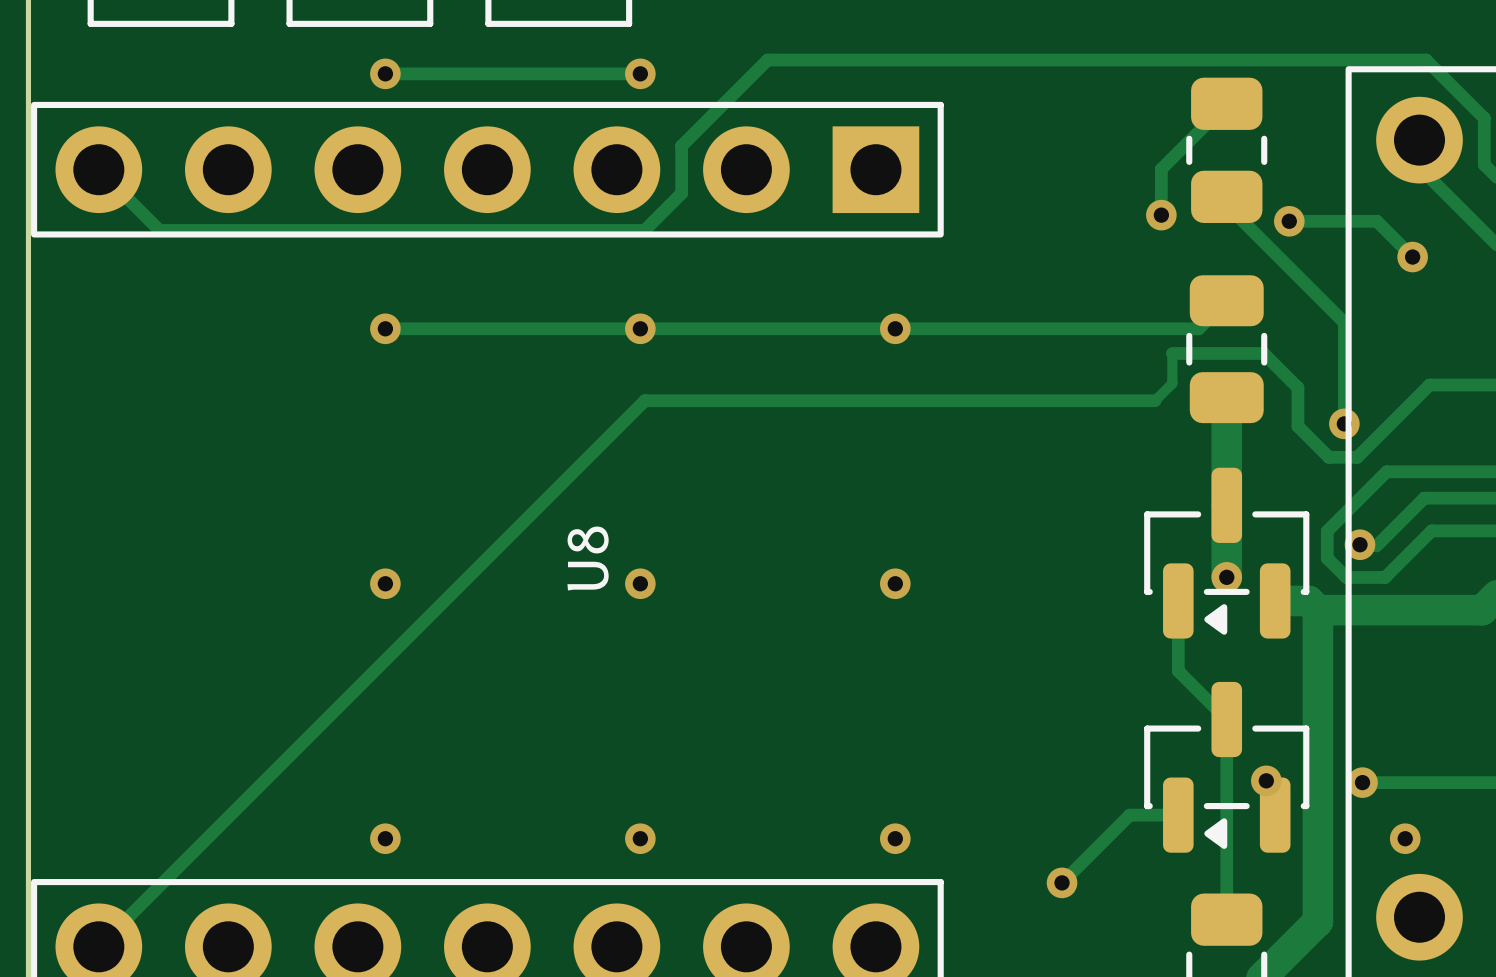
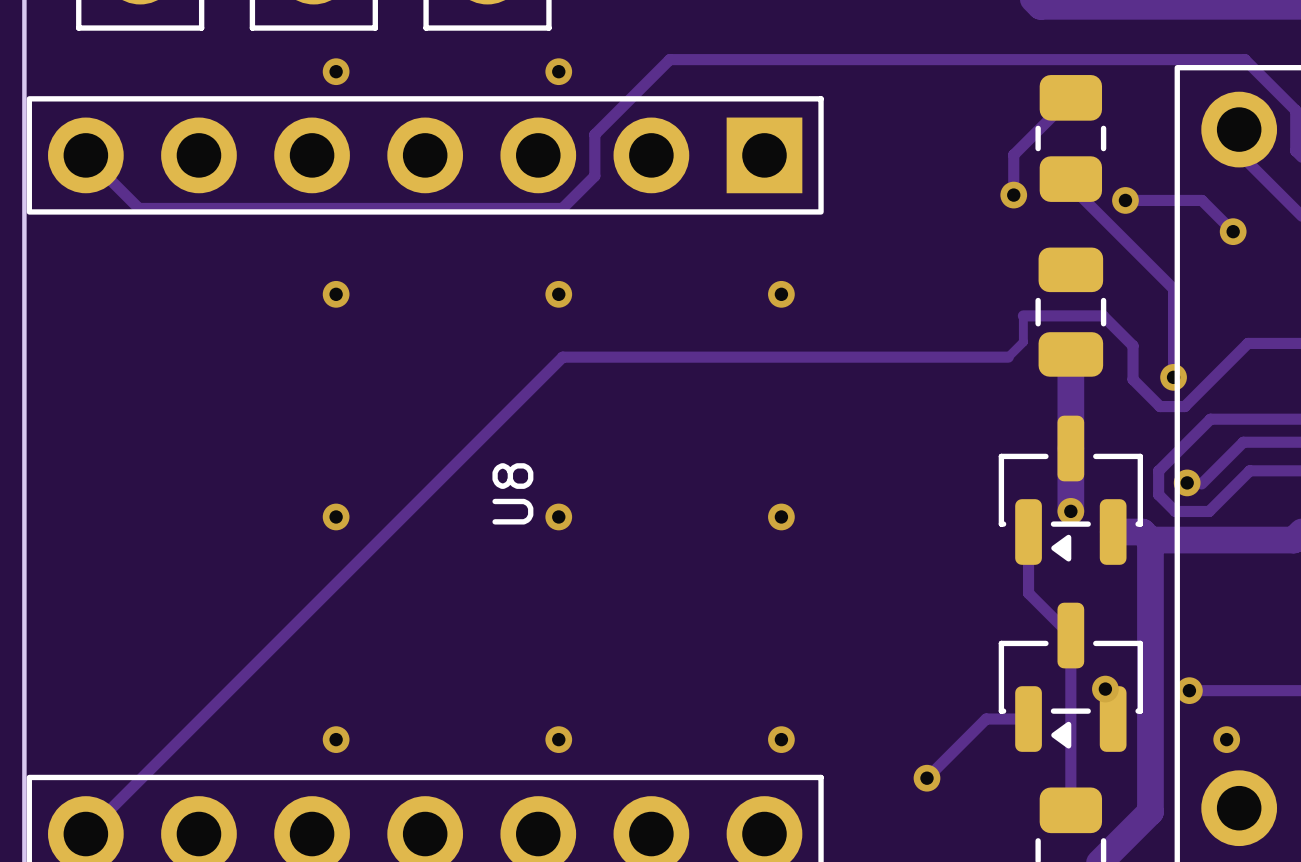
track: (385, 73) (640, 73) -> none
track: (1226, 300) (1198, 328) (385, 328) -> none

